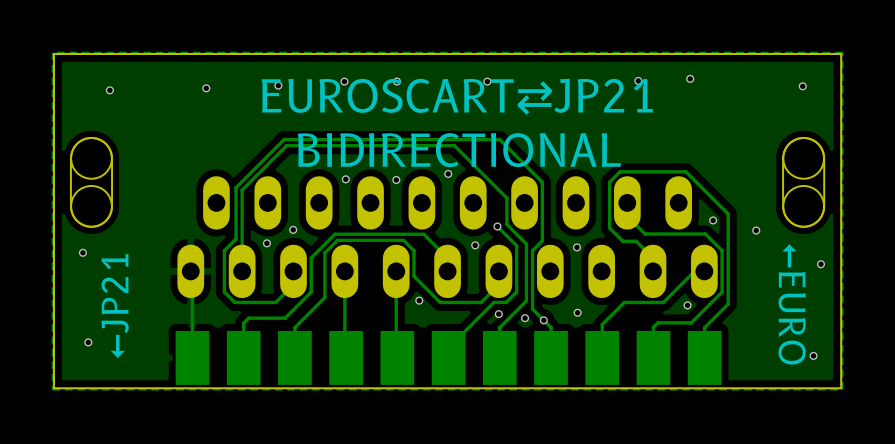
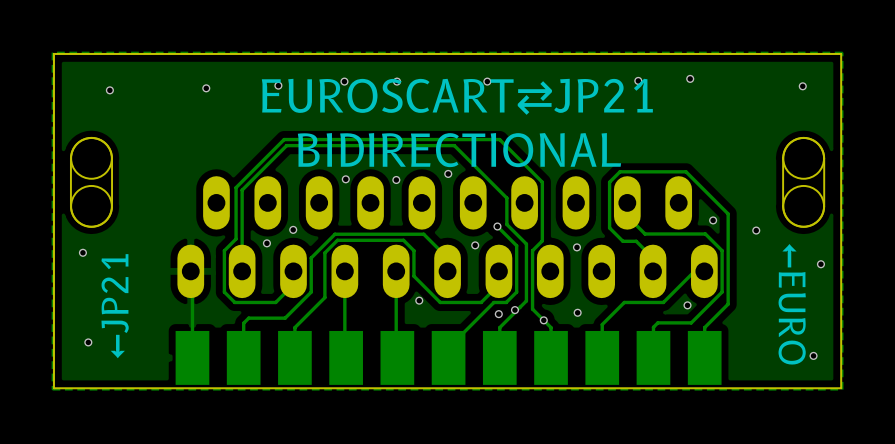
via position: (525, 318) -> (514, 310)

